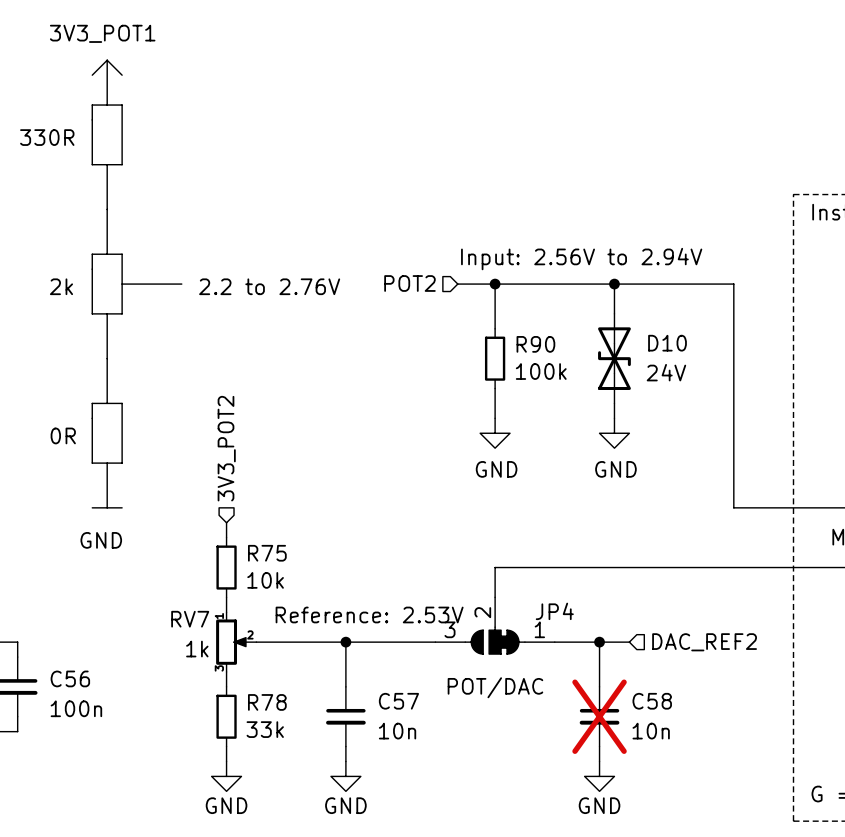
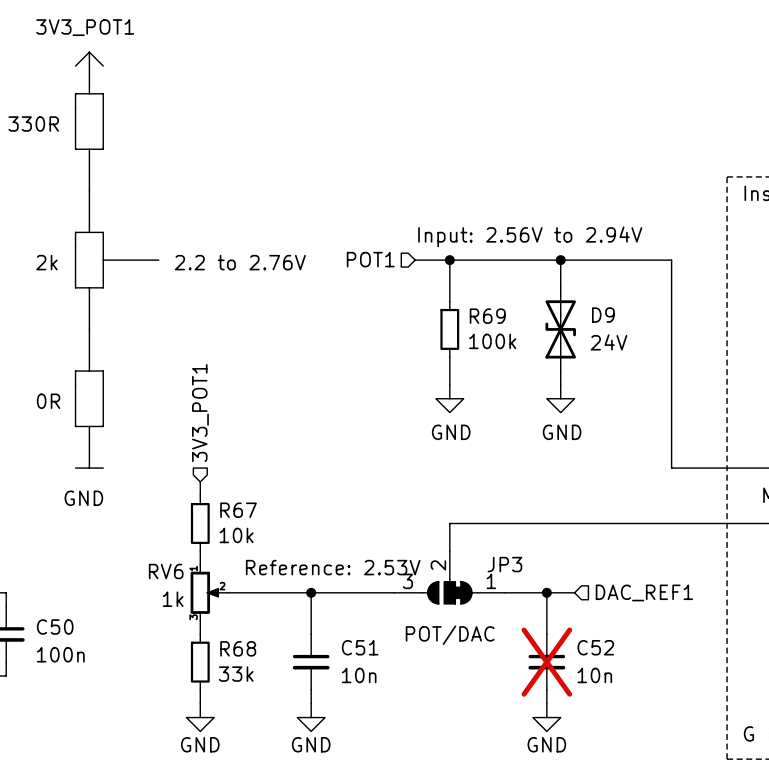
hierarchical label: POT2 (409, 283) -> POT1 (370, 259)
D10 name: D10 (667, 343) -> D9 (603, 315)
R90 name: R90 (535, 344) -> R69 (487, 316)
hierarchical label: 3V3_POT2 (226, 448) -> 3V3_POT1 (200, 413)
R75 name: R75 (267, 553) -> R67 (238, 510)
JP4 name: JP4 (554, 611) -> JP3 (504, 564)
RV7 name: RV7 (190, 619) -> RV6 (166, 571)
hierarchical label: DAC_REF2 (704, 642) -> DAC_REF1 (644, 592)
C56 name: C56 (70, 678) -> C50 (55, 627)
C57 name: C57 (398, 701) -> C51 (360, 647)
C58 name: C58 (652, 701) -> C52 (595, 647)
R78 name: R78 (267, 702) -> R68 (238, 648)

